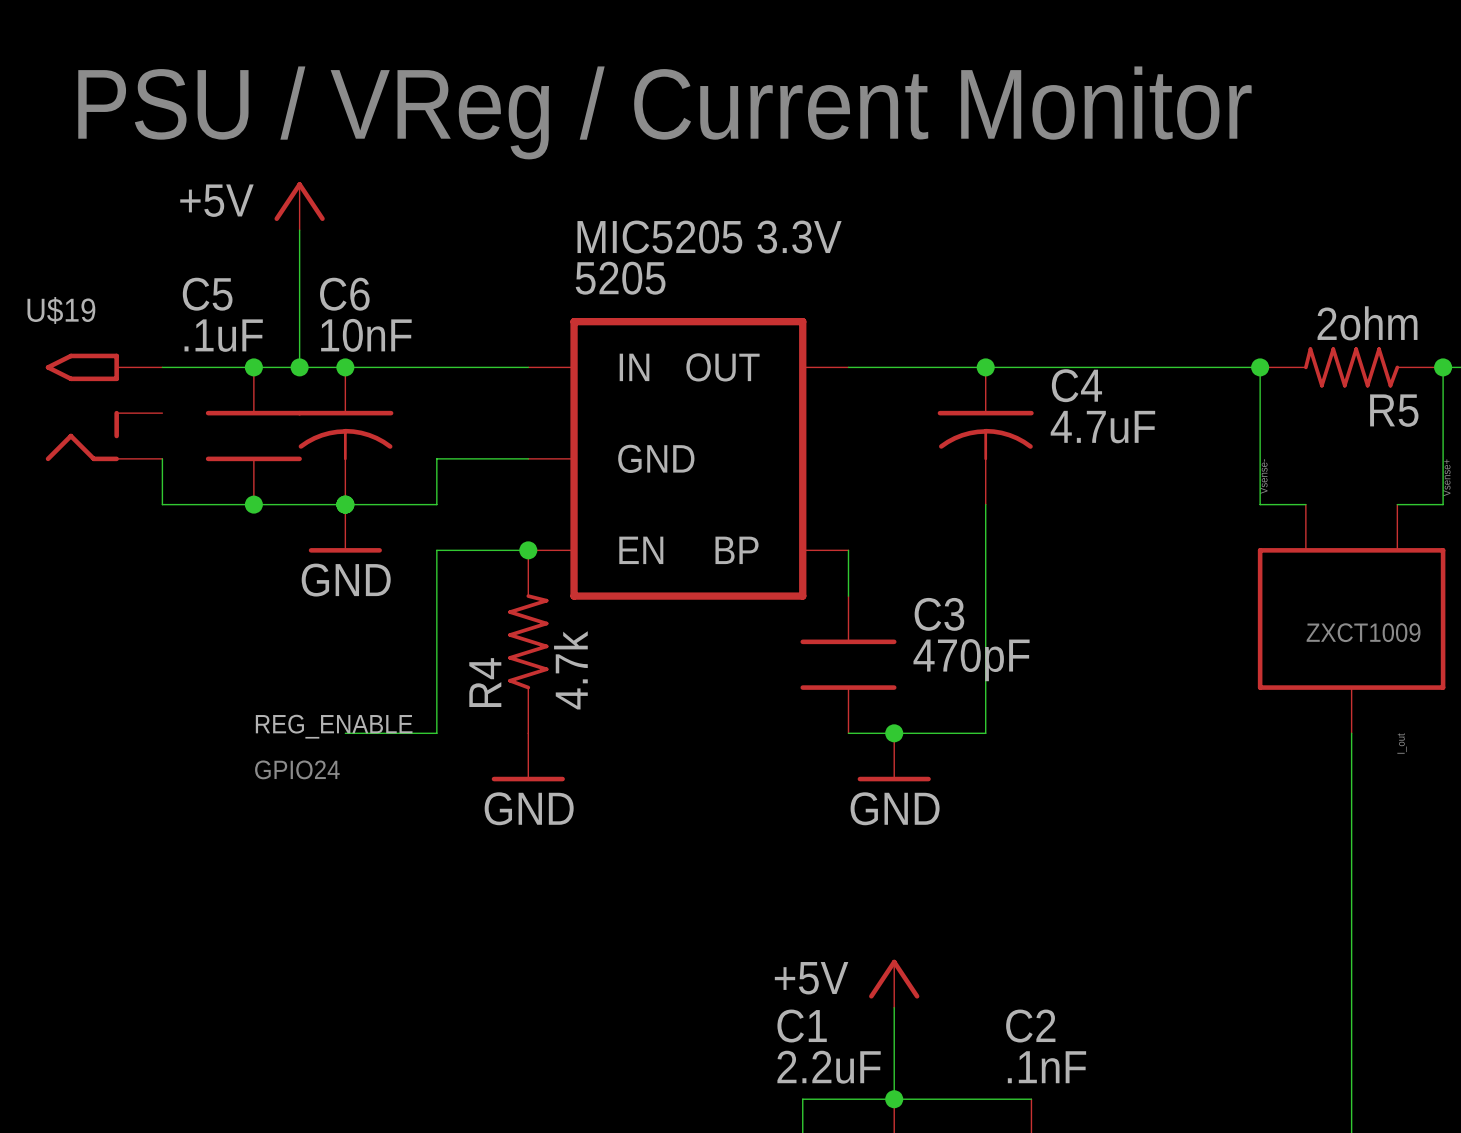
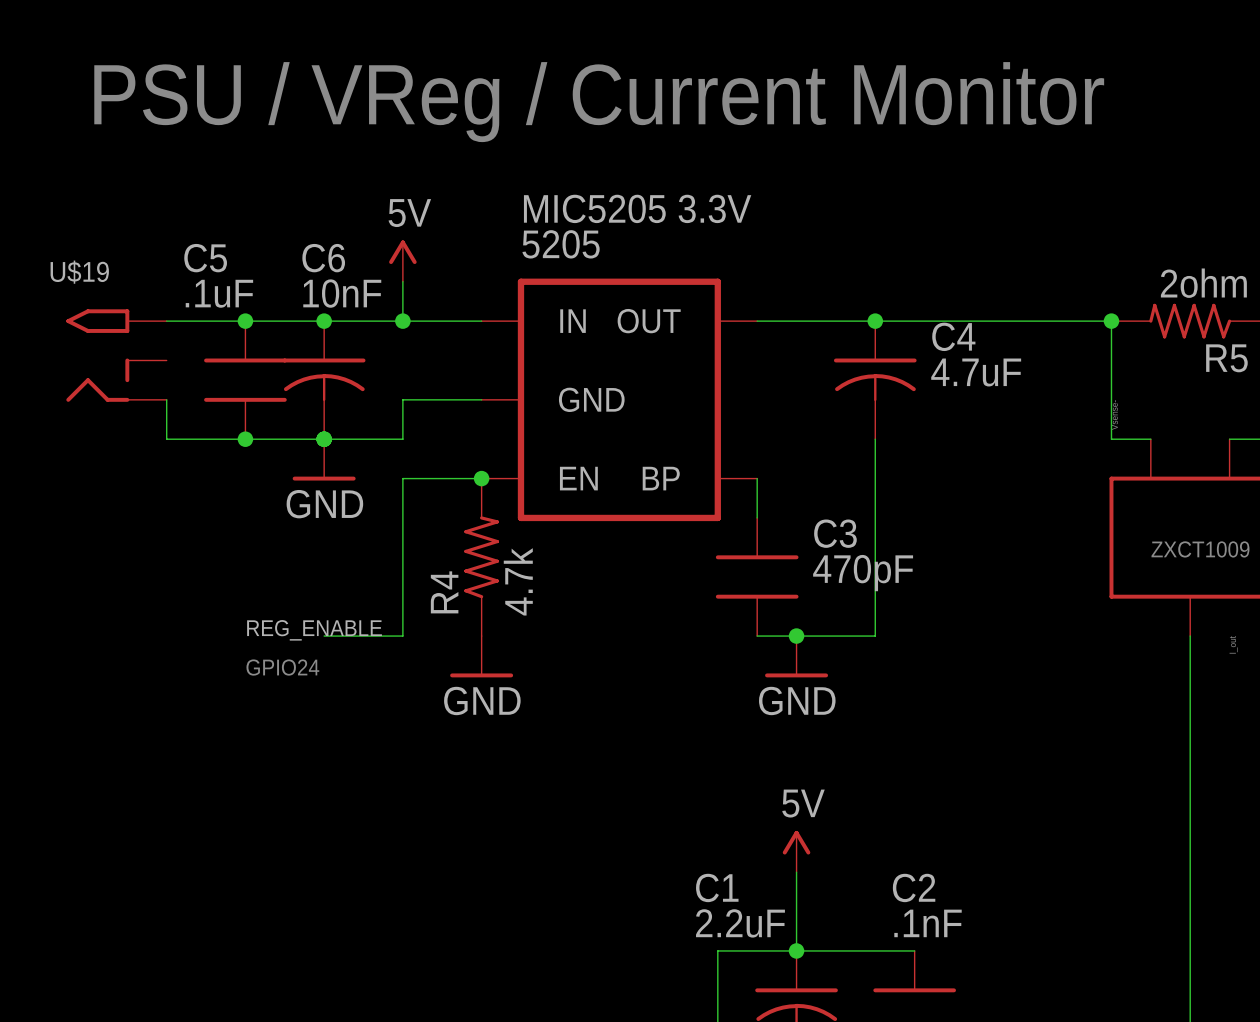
power symbol: +5V (299, 206) -> none
wire: (299, 230) (299, 367) -> none
power symbol: none -> 5V (402, 261)
wire: none -> (402, 281) (402, 321)
junction: (299, 367) -> none
junction: none -> (402, 321)
power symbol: +5V (894, 983) -> 5V (796, 851)

